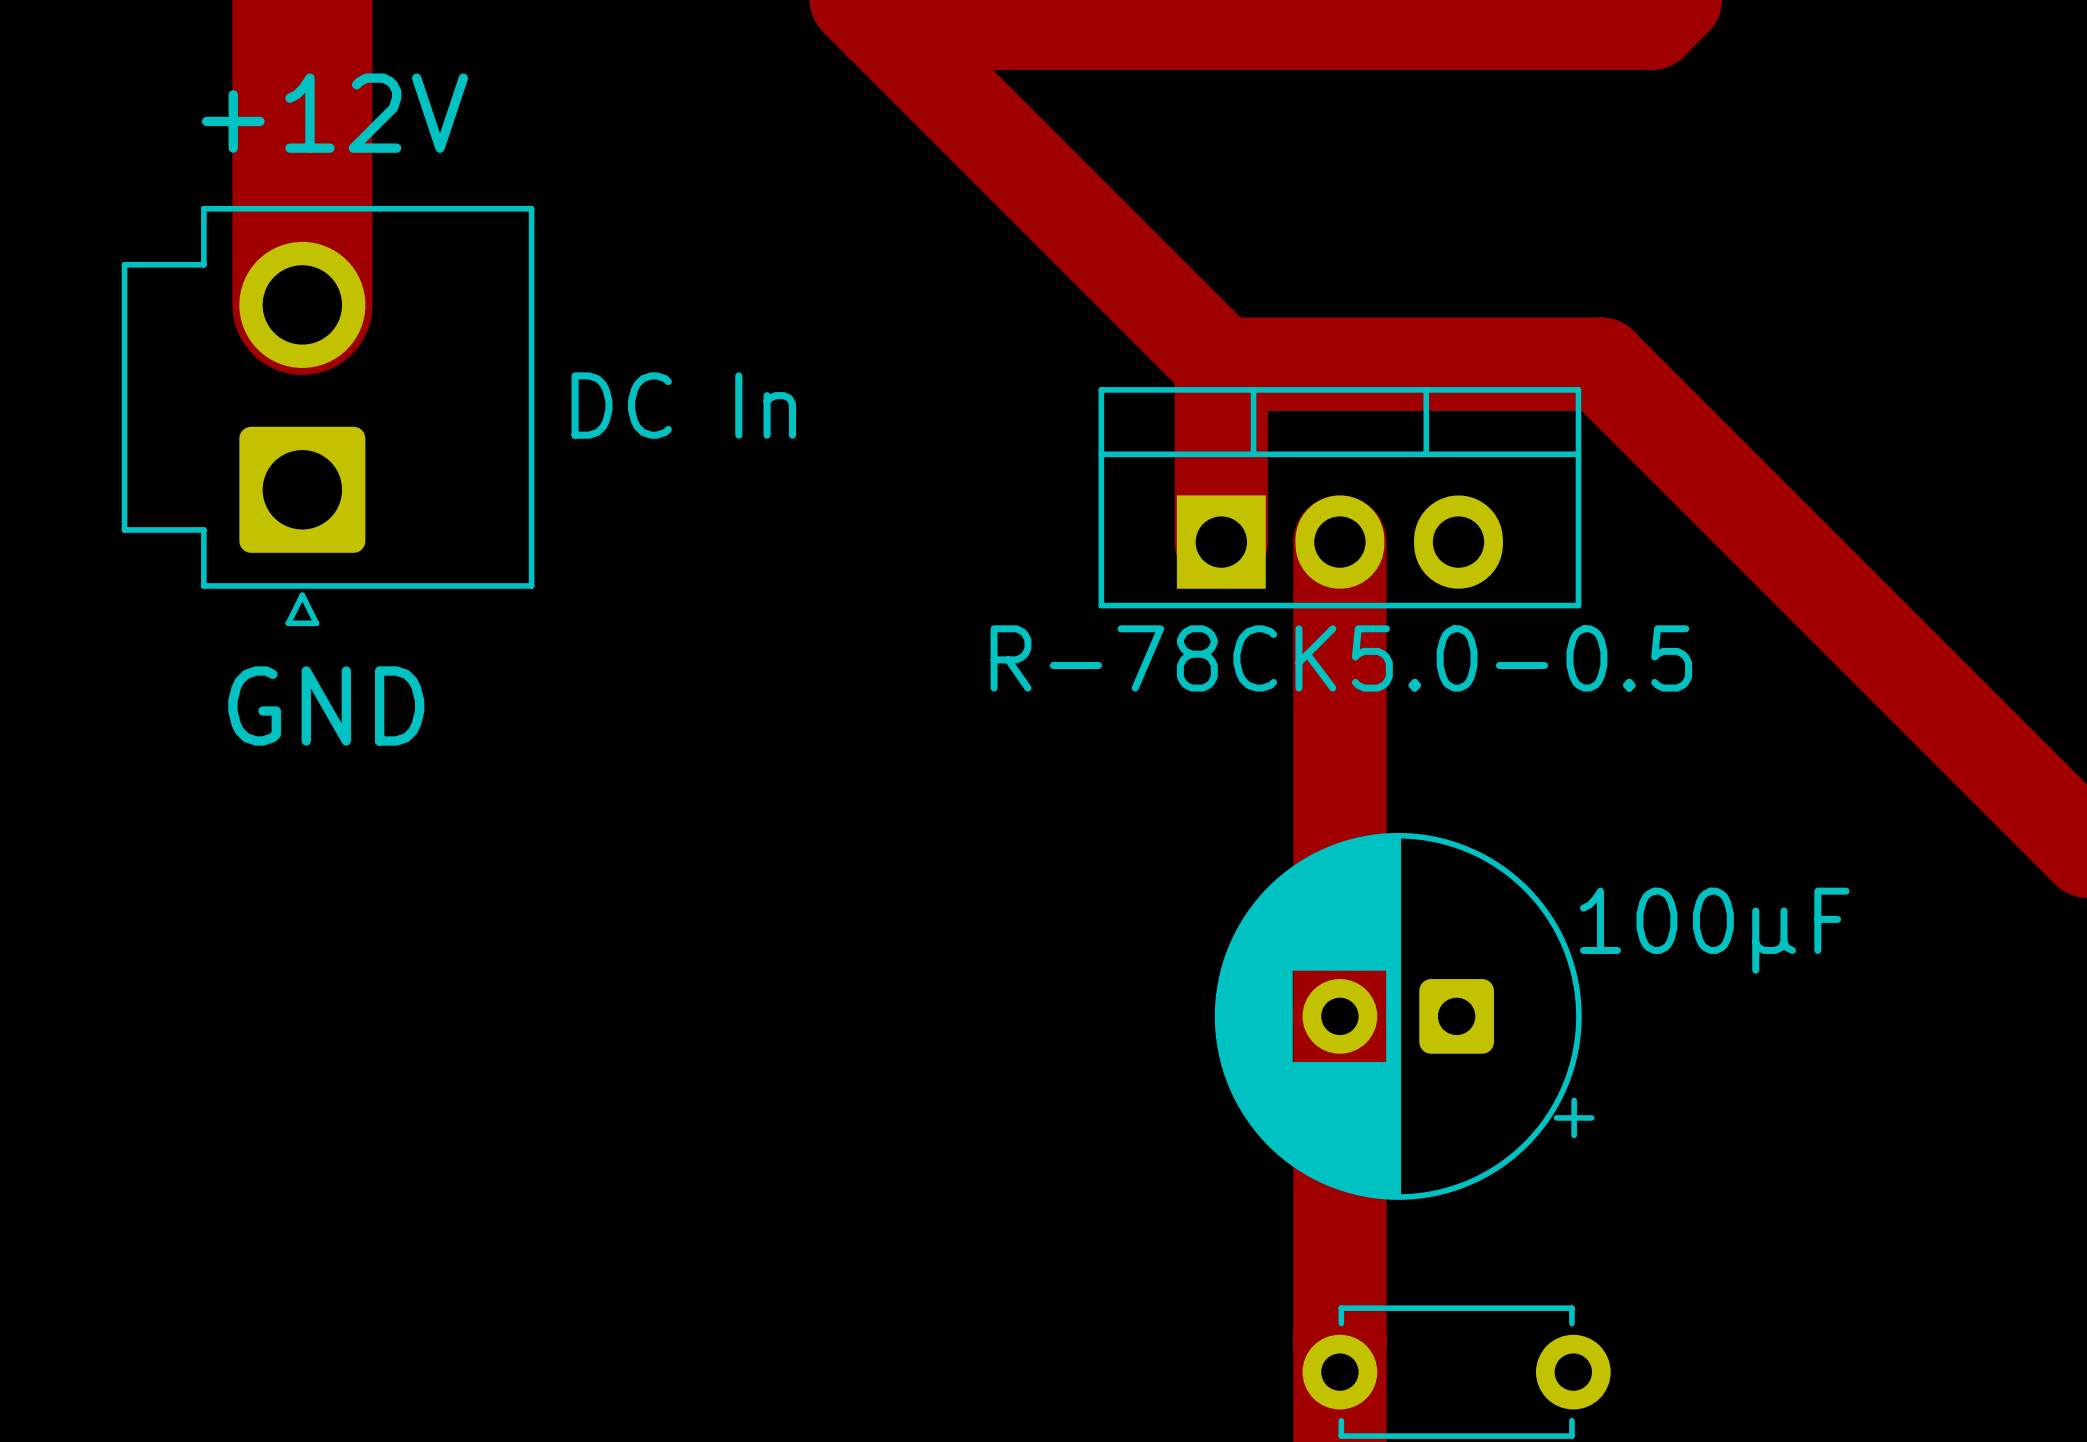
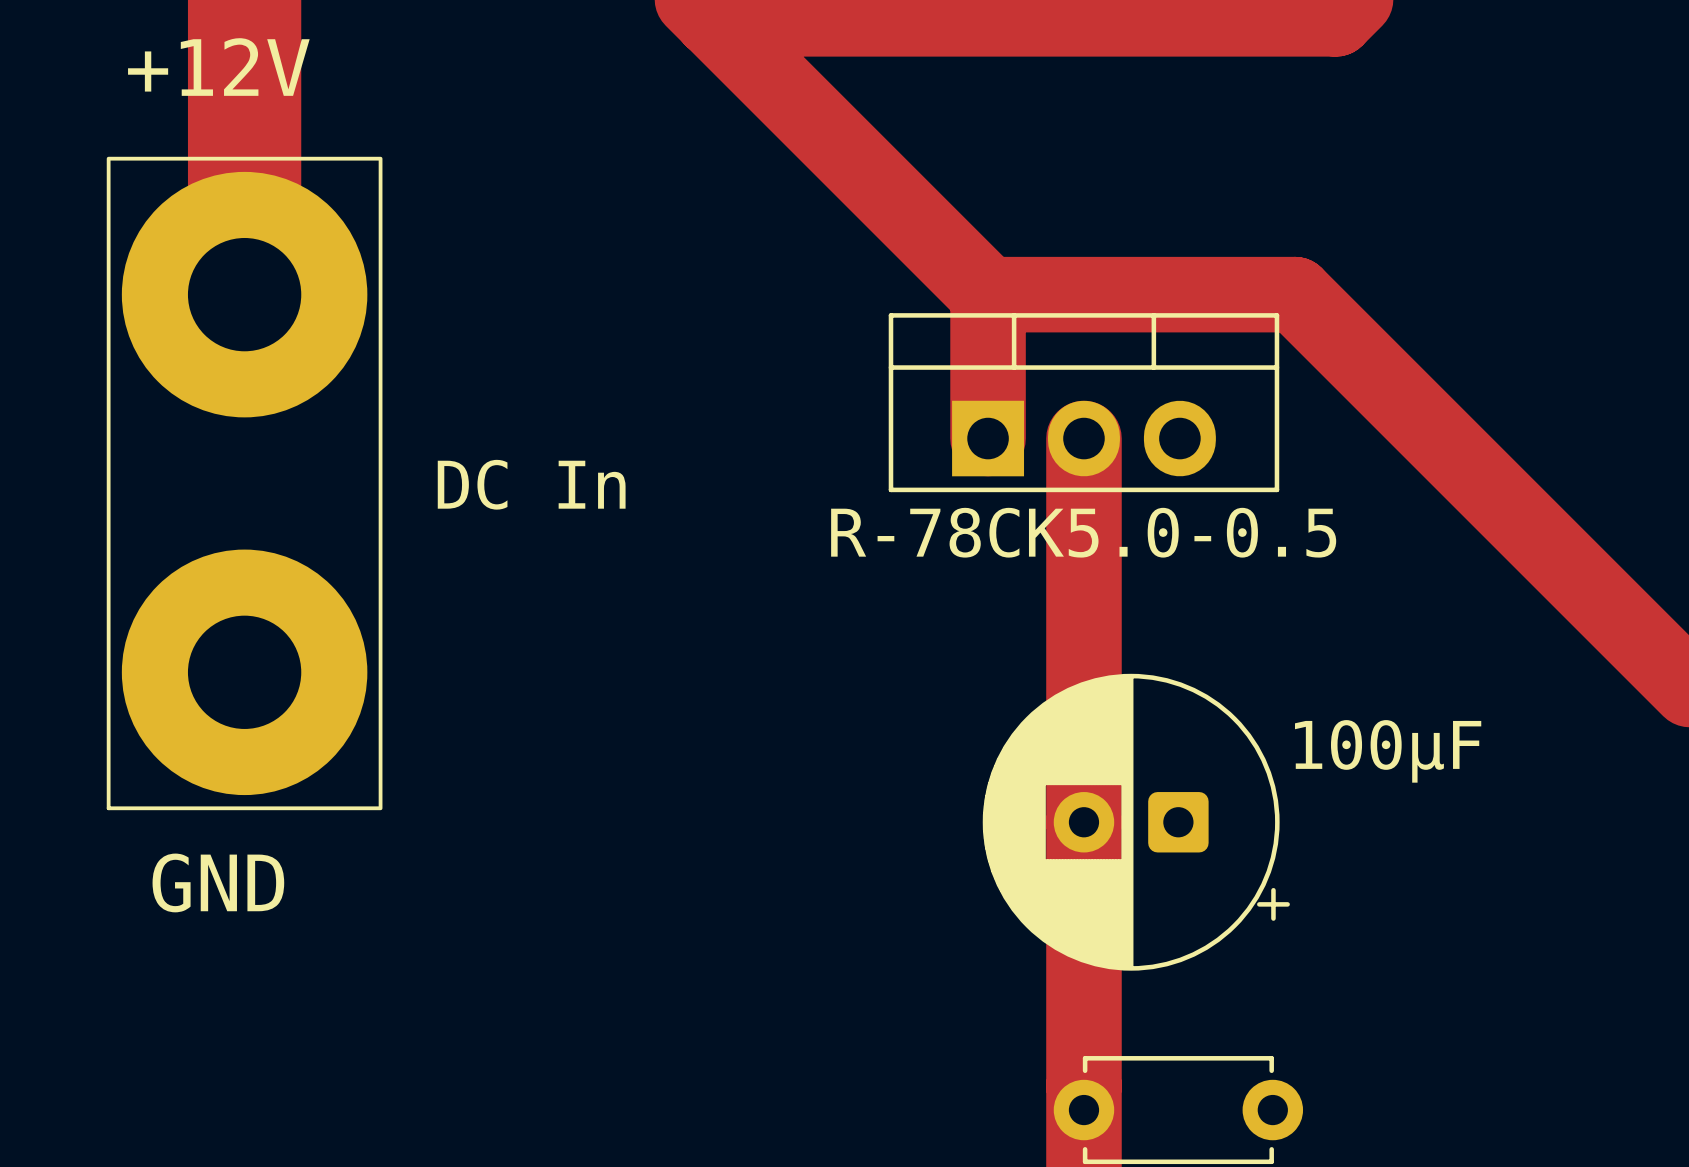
text position: +12V (334, 113) -> +12V (218, 67)
part: DC In (328, 416) -> none
part: none -> DC In (244, 483)
text position: GND (326, 706) -> GND (218, 882)

